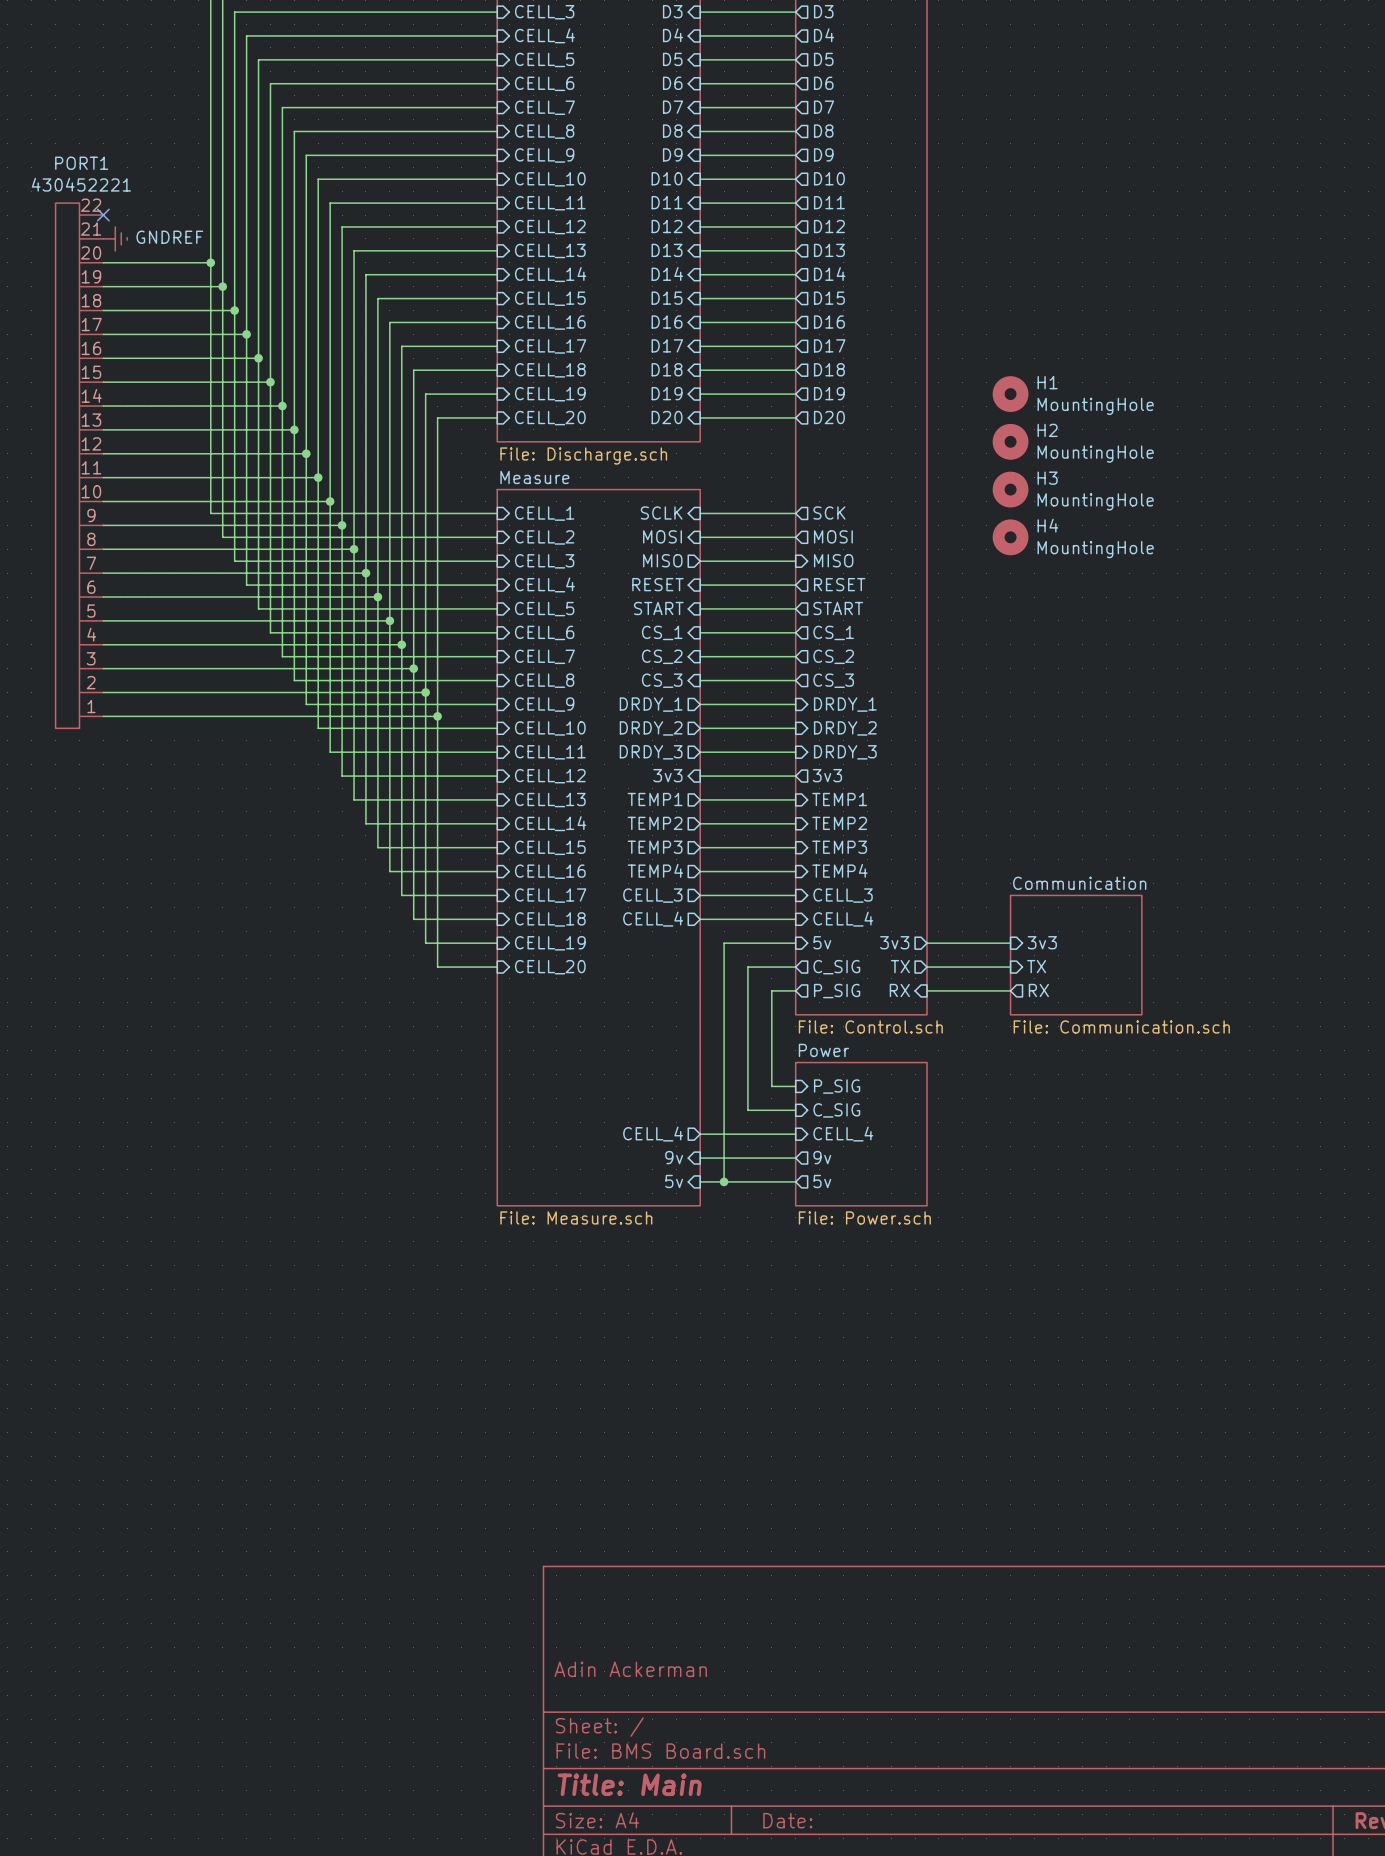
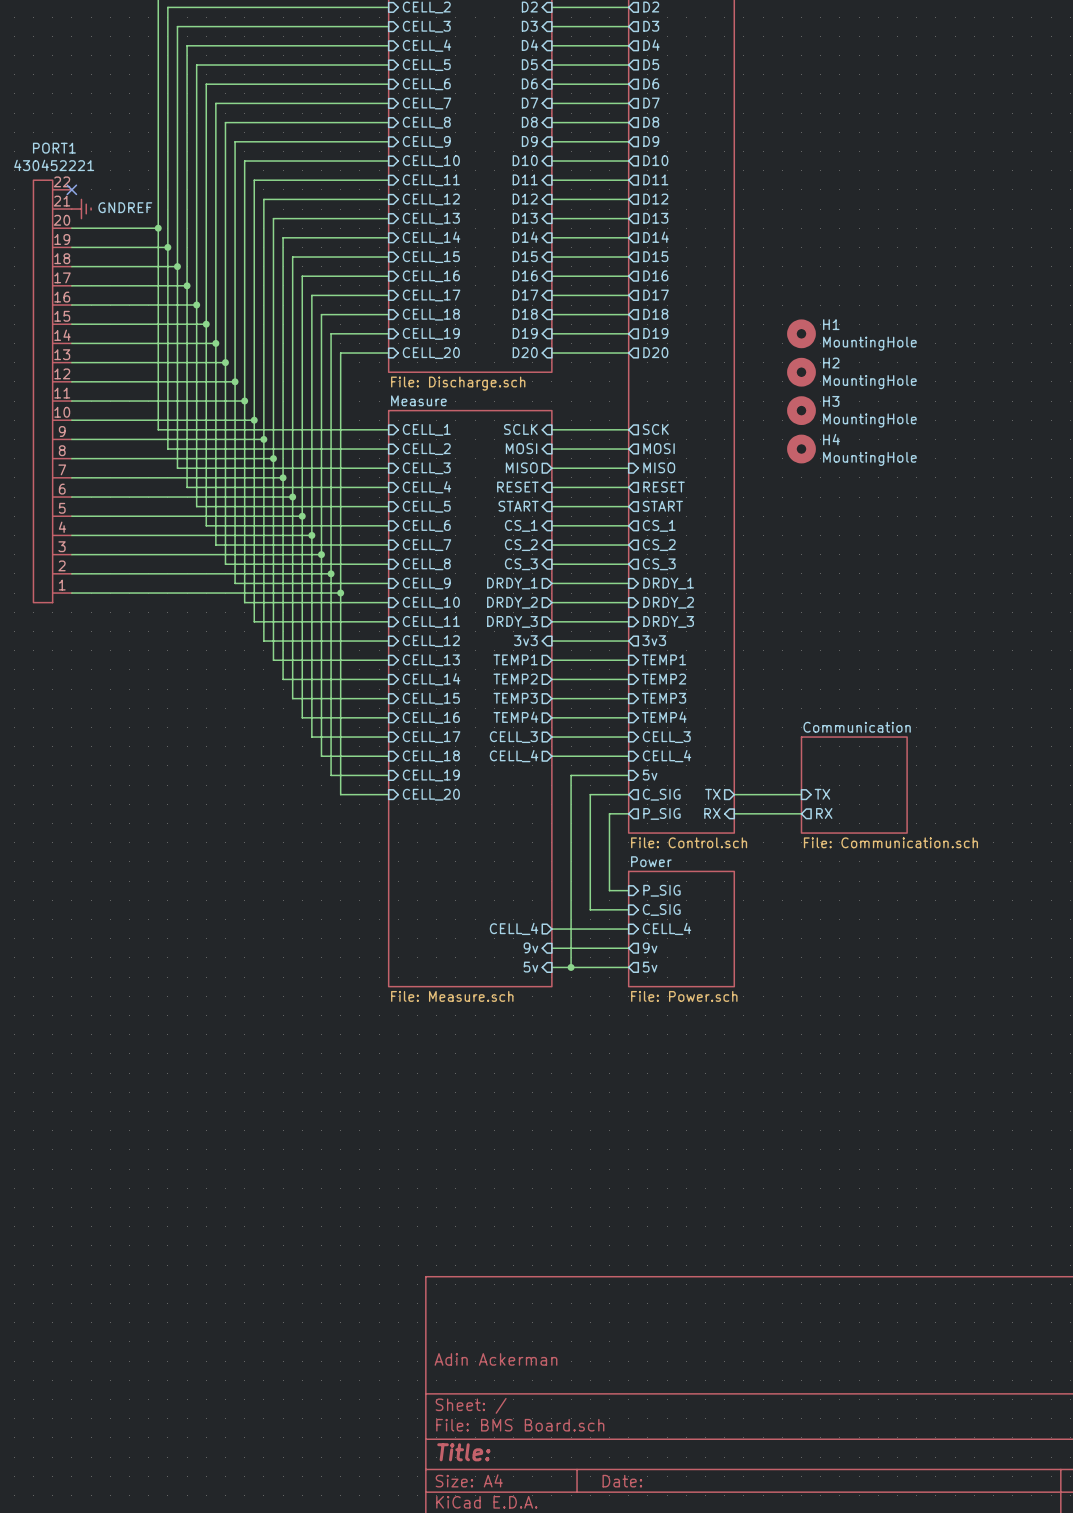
sheet pin: 3v3 (894, 942) -> none
sheet pin: 3v3 (1042, 942) -> none
wire: (927, 943) (1010, 943) -> none
title block: Title: Main (629, 1784) -> Title: (463, 1452)

